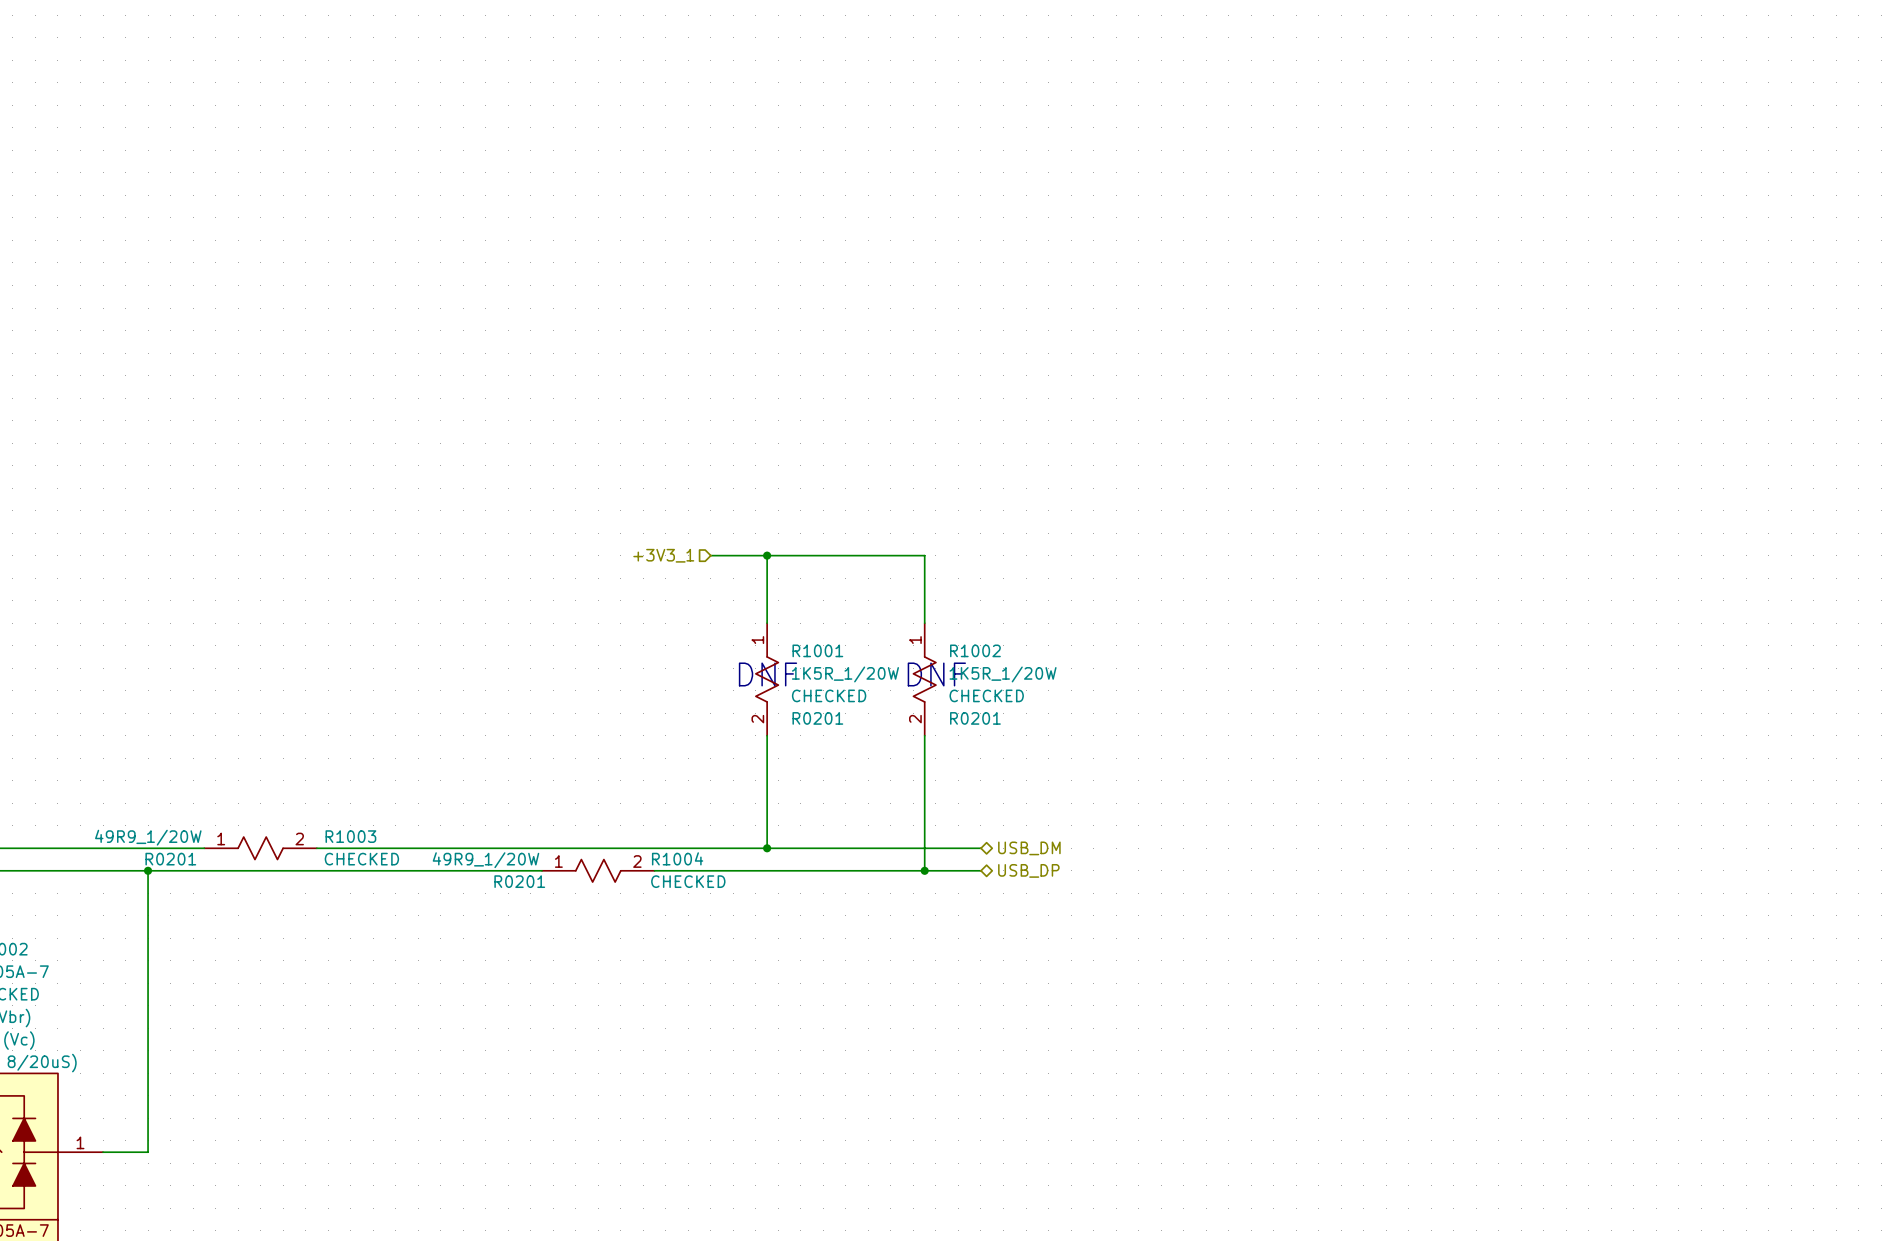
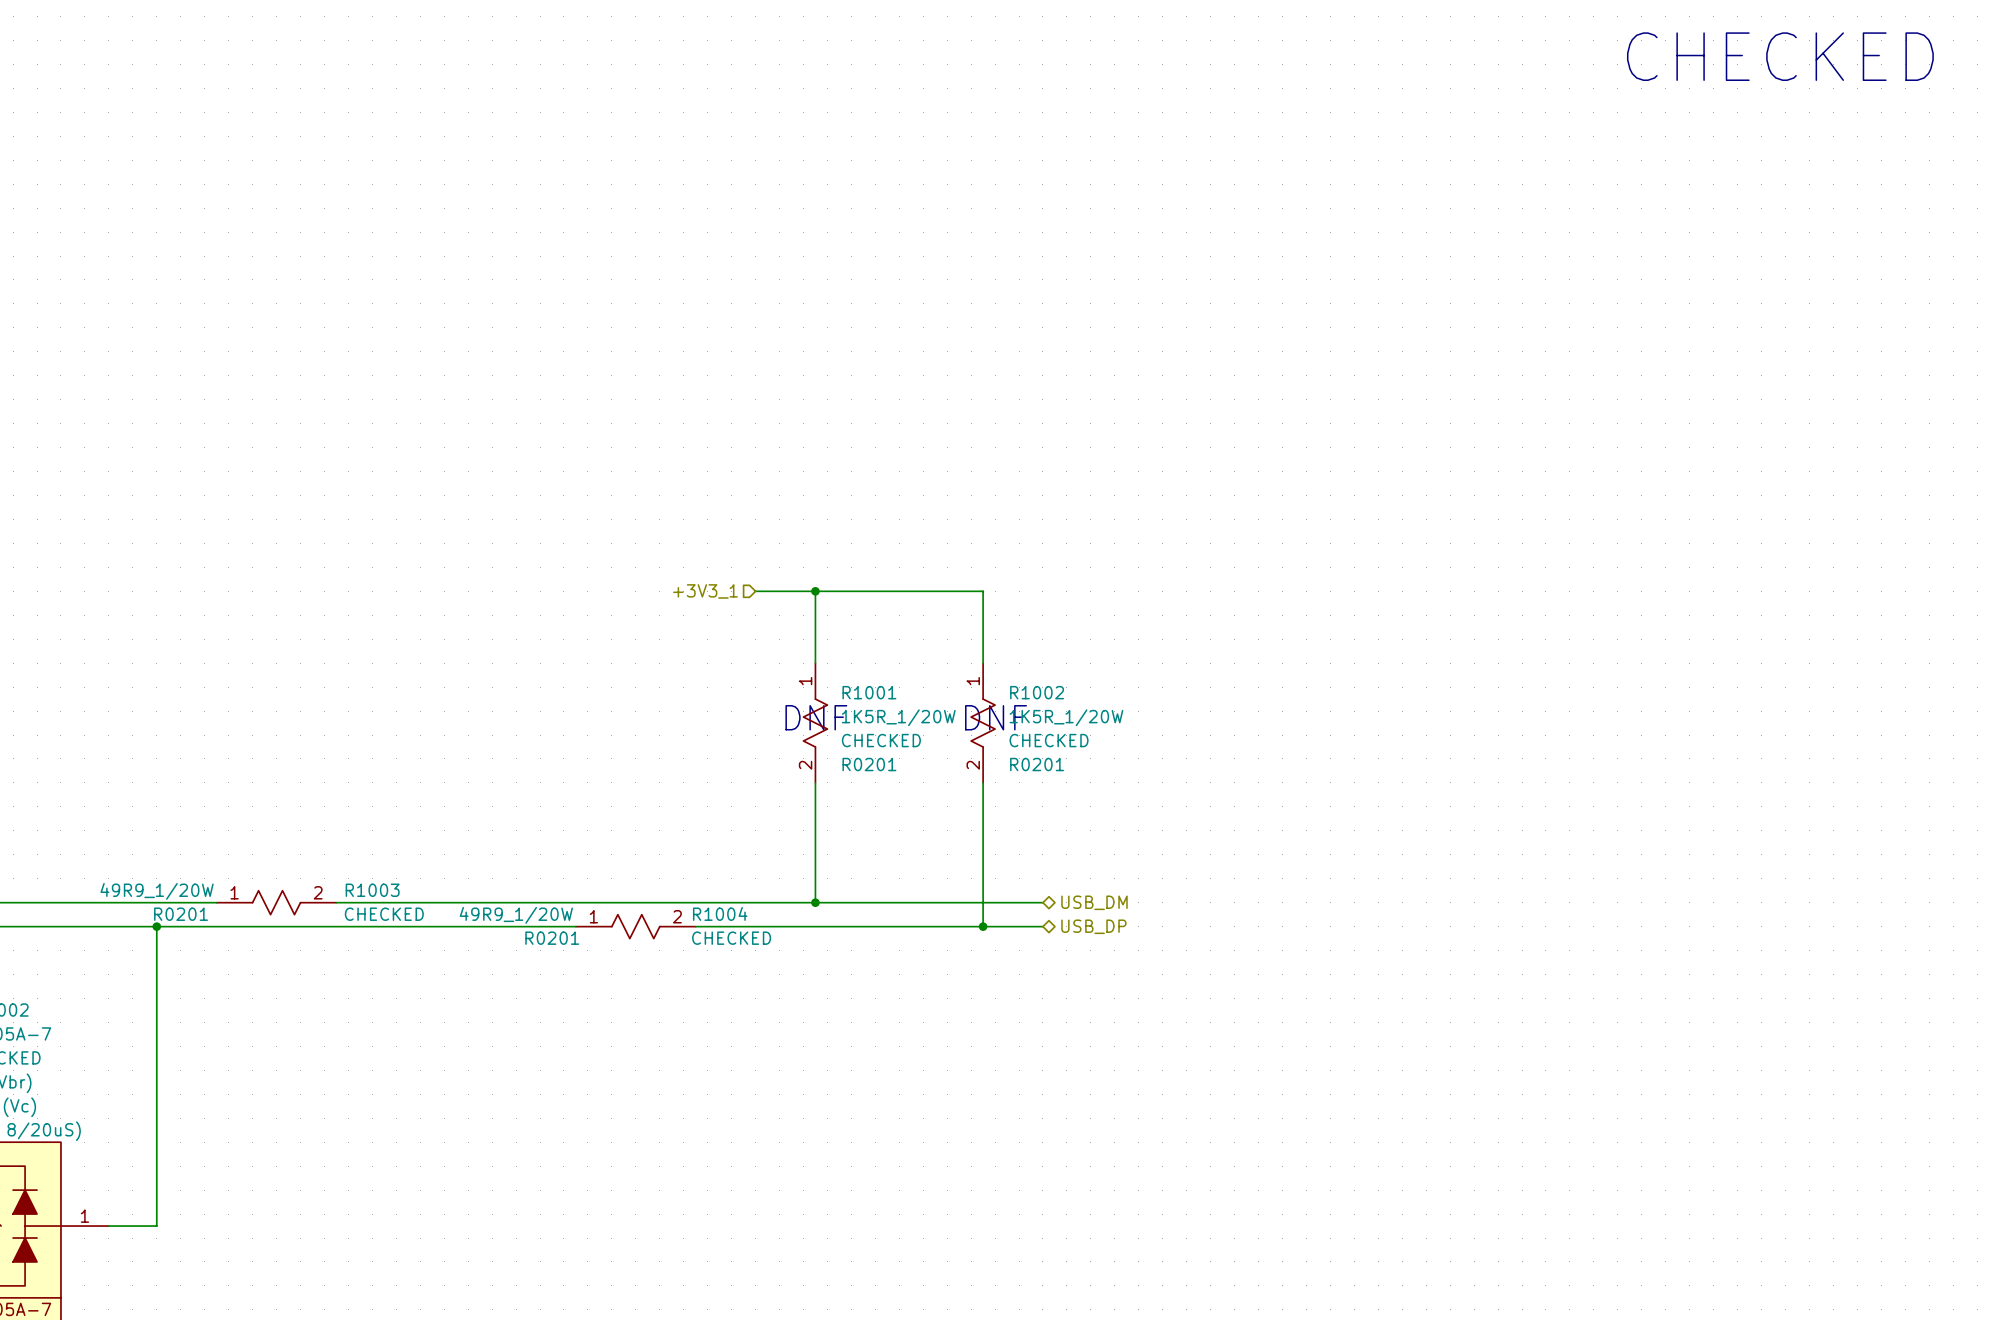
text: none -> CHECKED (1780, 56)

